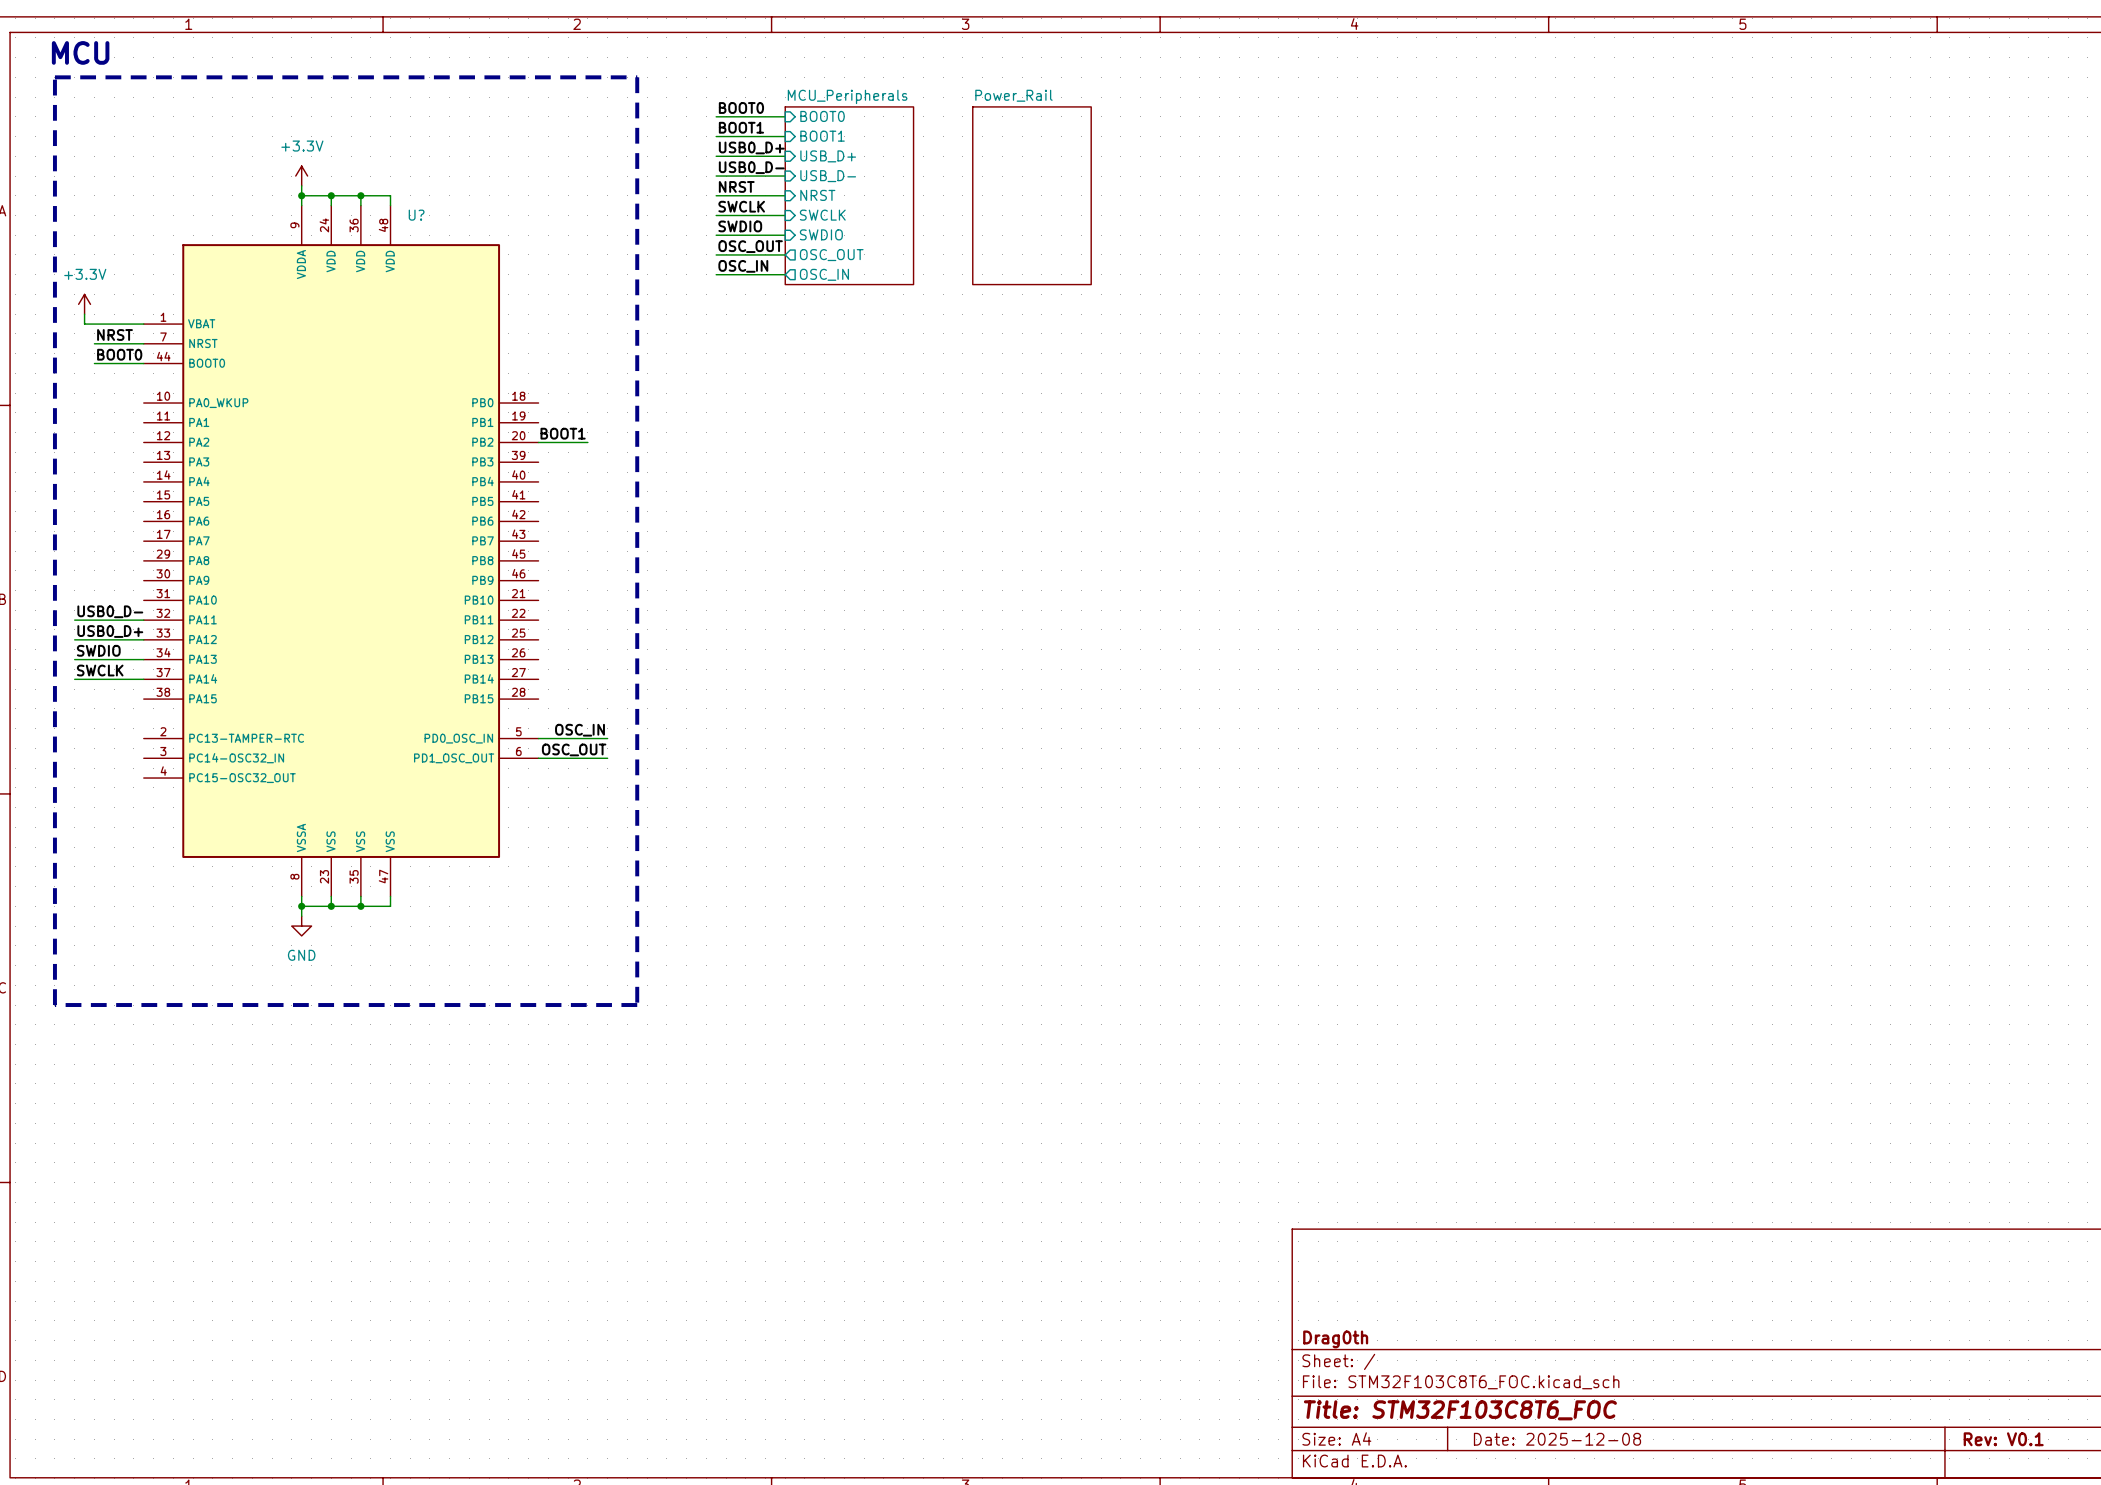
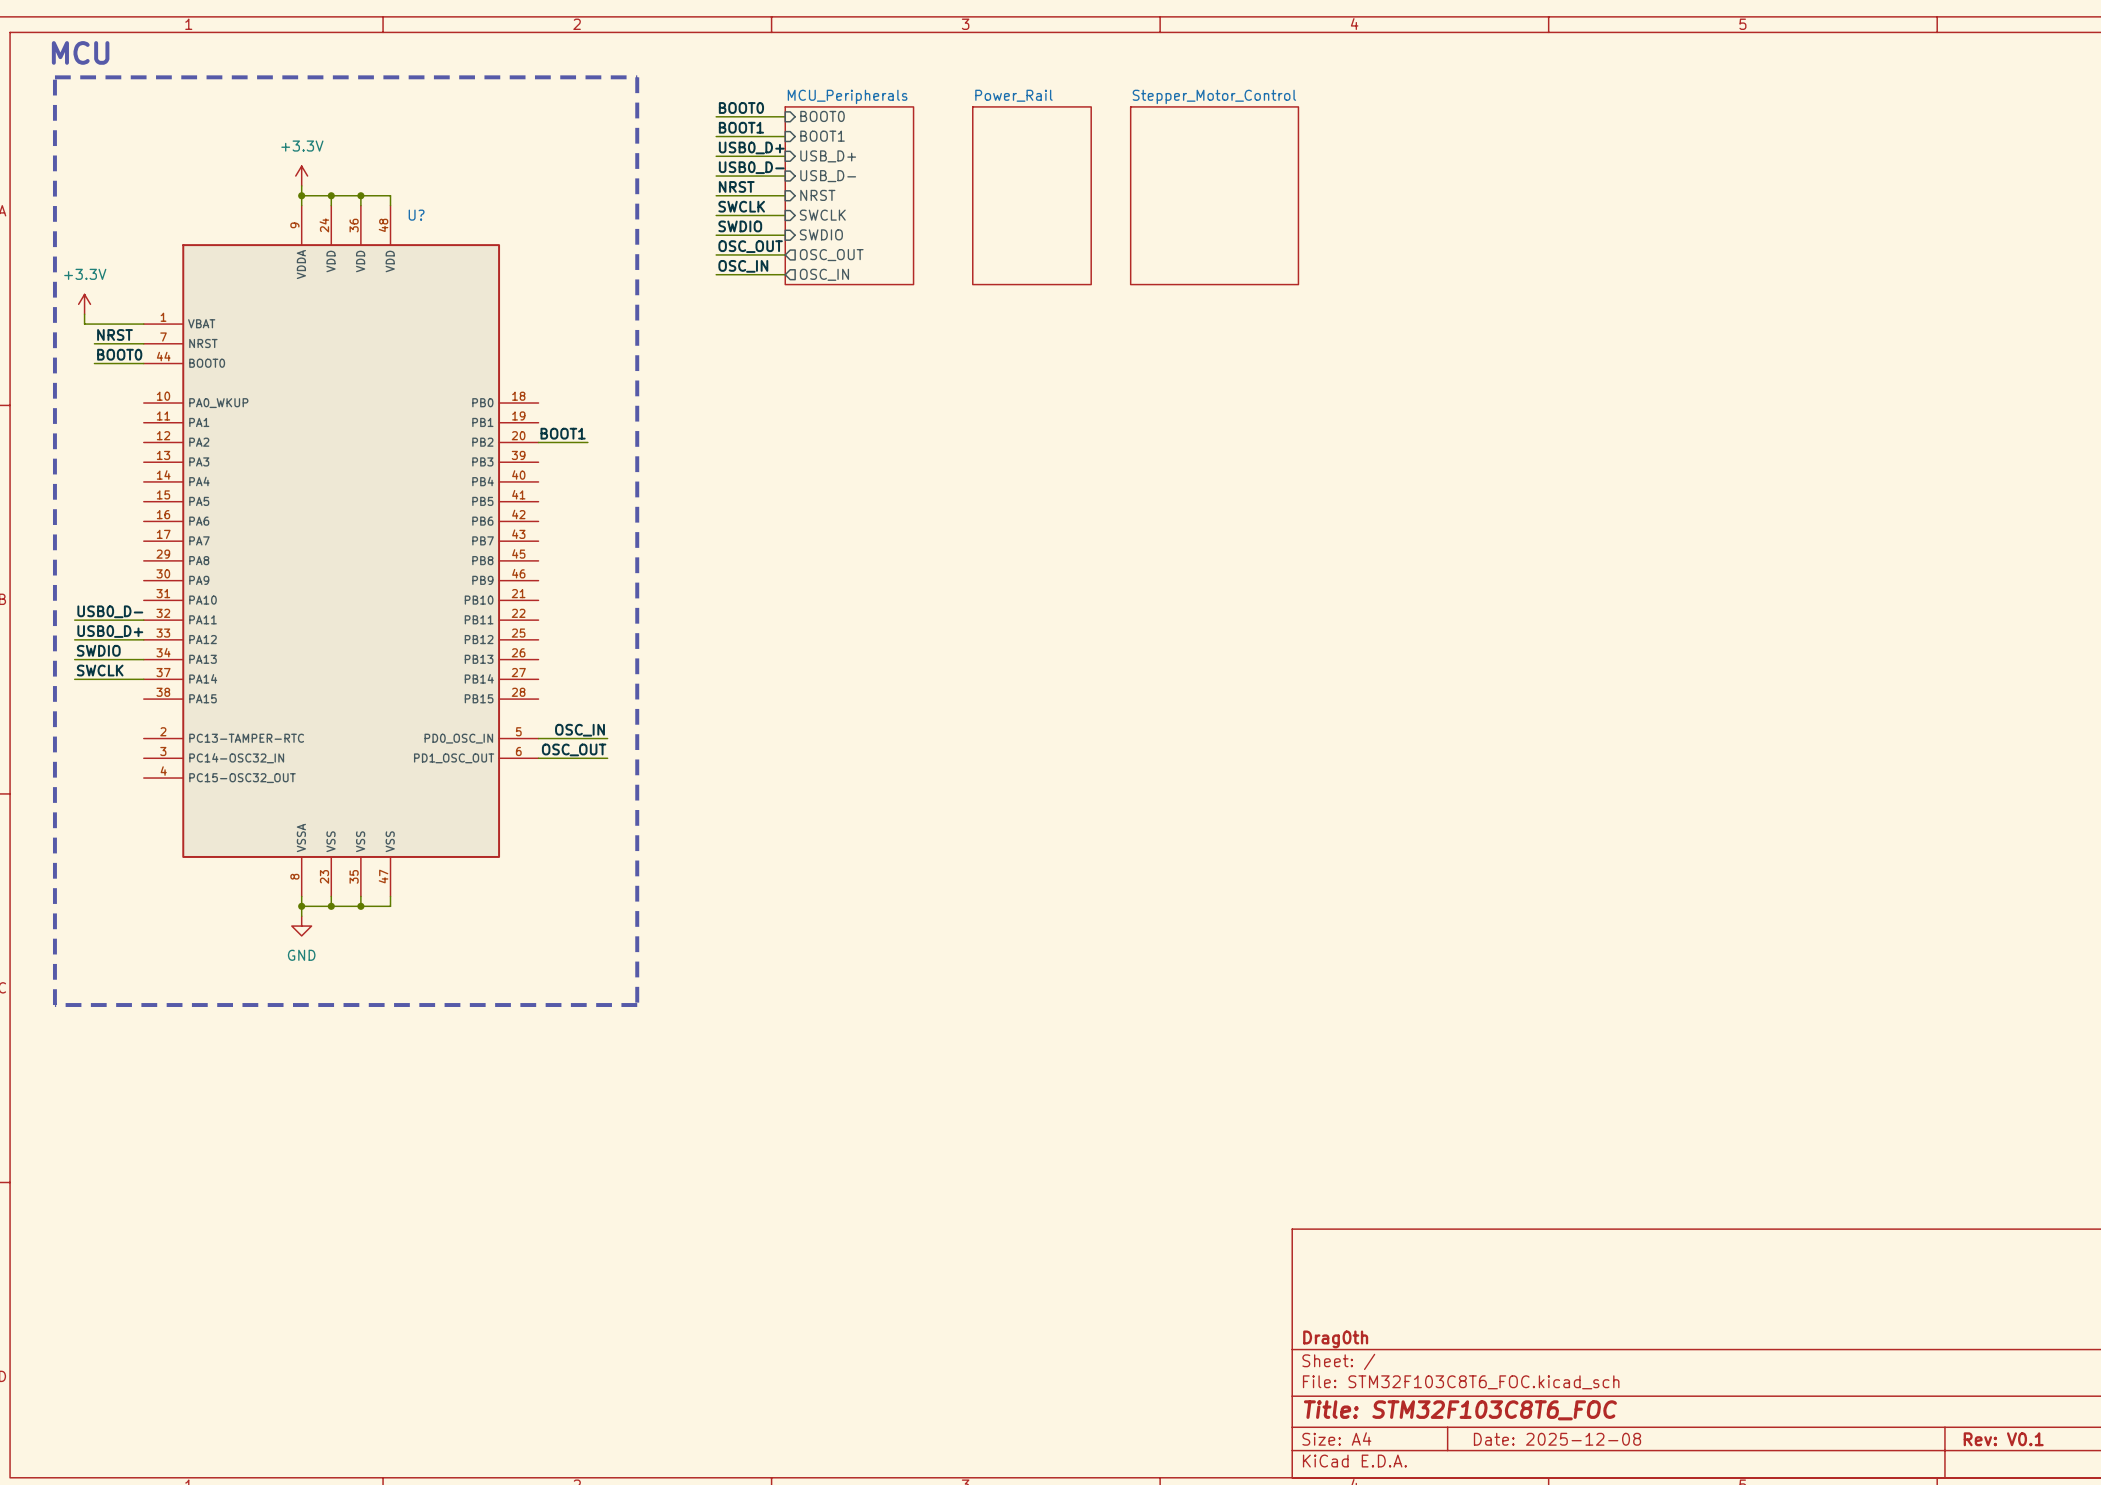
sheet Stepper_Motor_Control: none -> (1214, 195)

